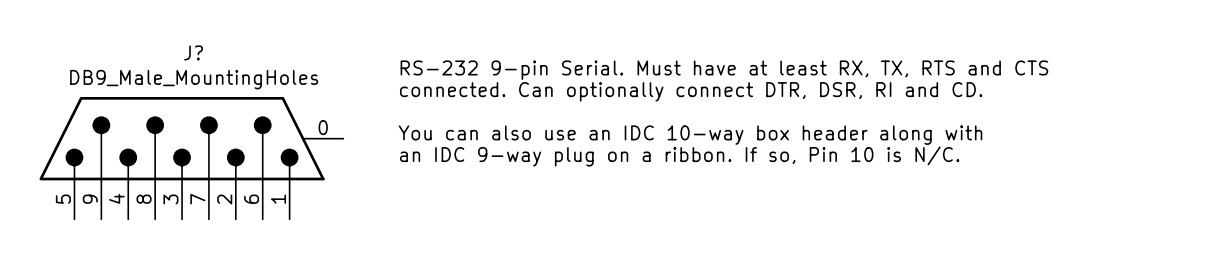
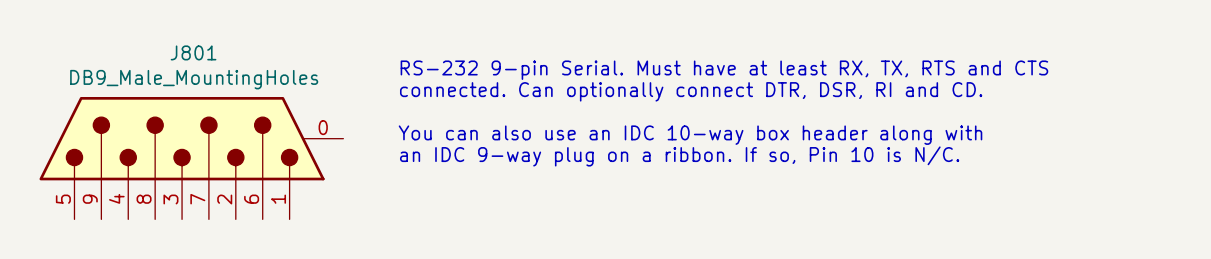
J? name: J? (193, 52) -> J801 (193, 52)

